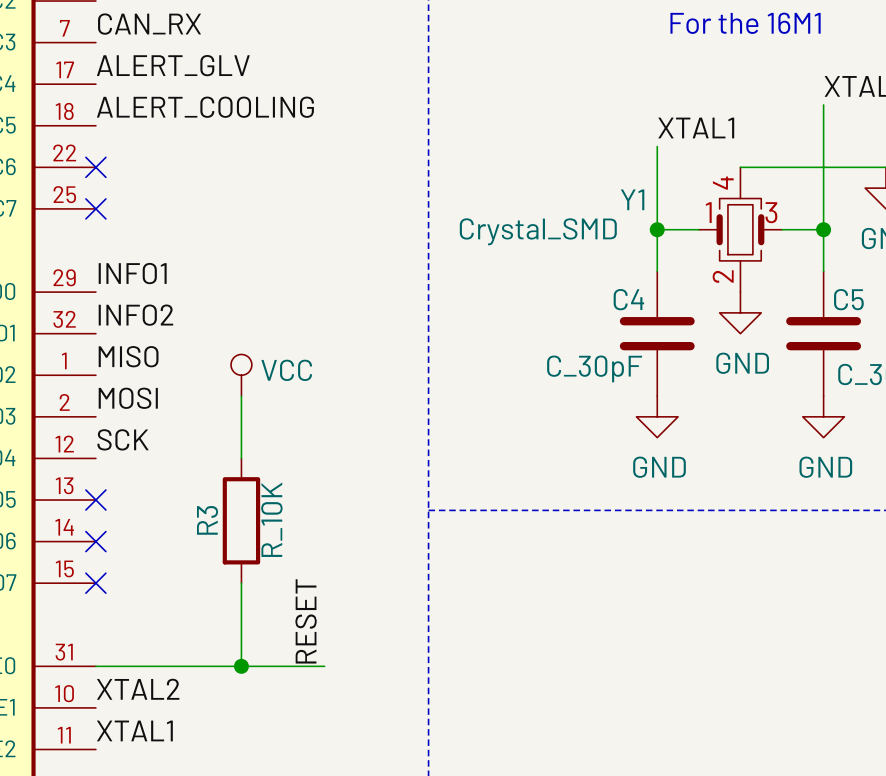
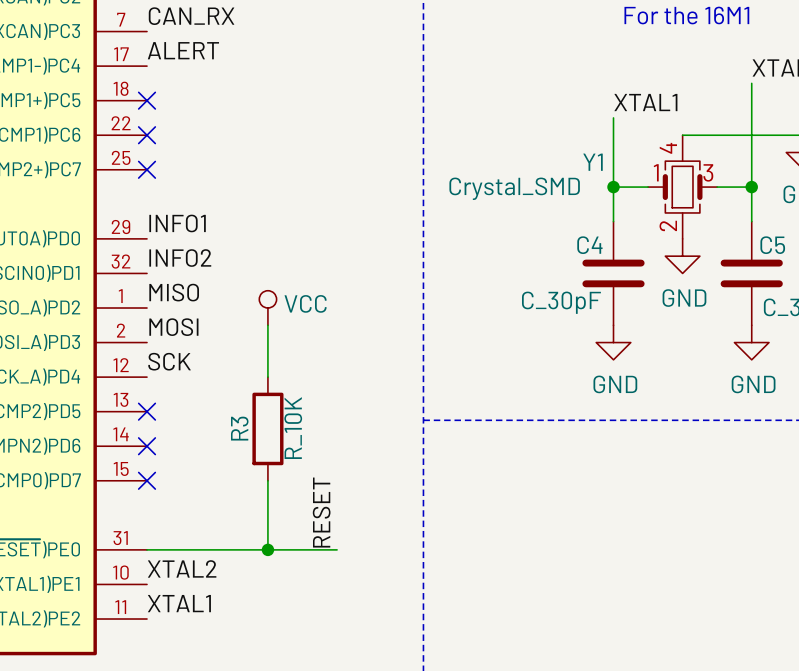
label: ALERT_GLV (173, 65) -> ALERT (183, 50)
label: ALERT_COOLING (205, 107) -> none
no-connect mark: none -> (147, 100)

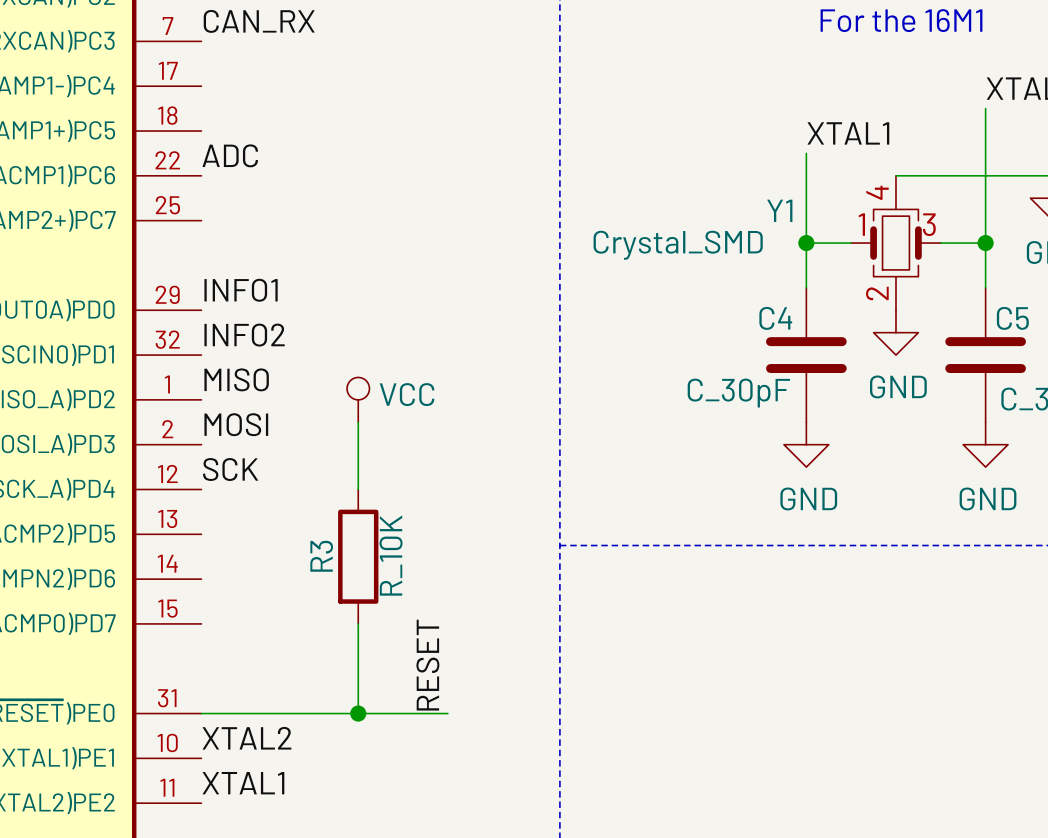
label: ALERT (183, 50) -> none
no-connect mark: (147, 100) -> none
label: none -> ADC (230, 155)
no-connect mark: (147, 135) -> none
no-connect mark: (147, 169) -> none
no-connect mark: (147, 411) -> none
no-connect mark: (147, 446) -> none
no-connect mark: (147, 480) -> none

